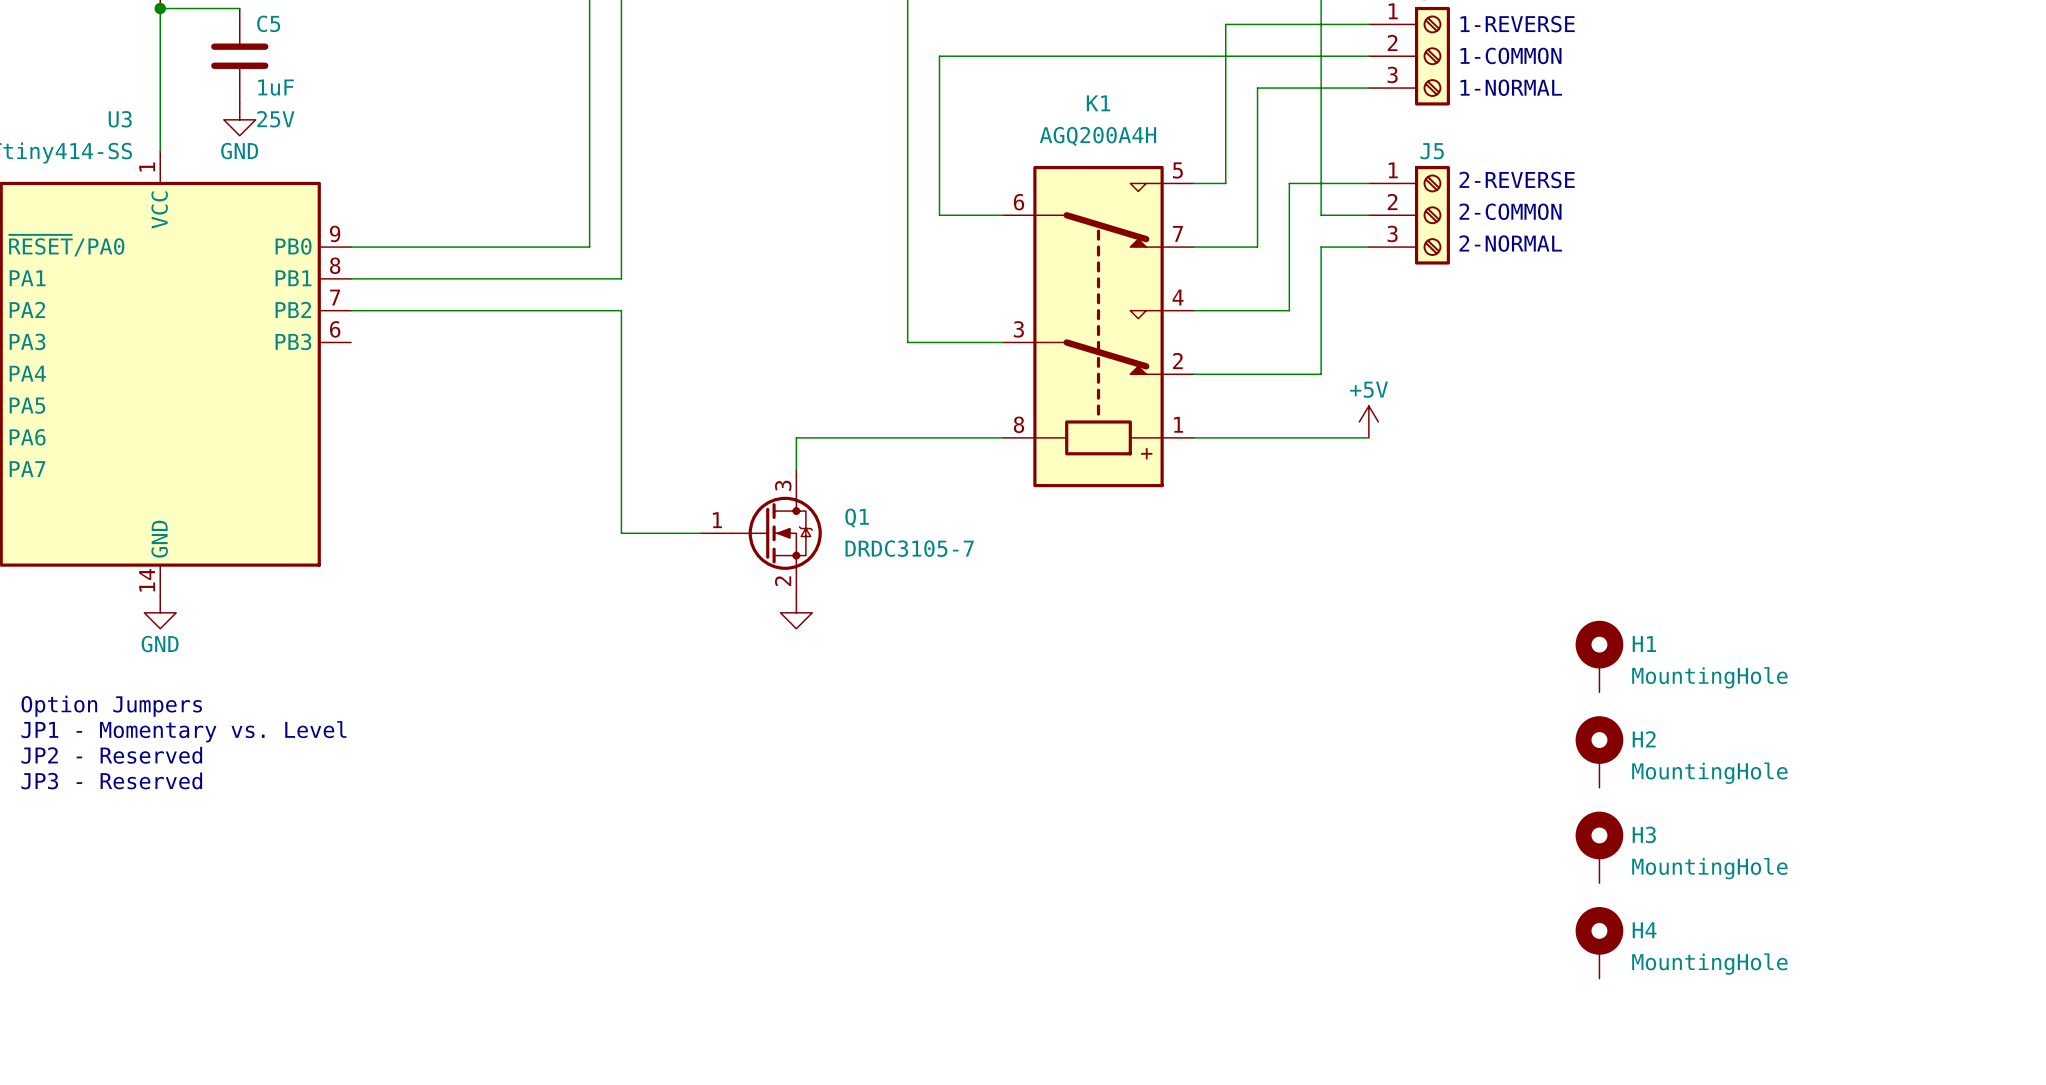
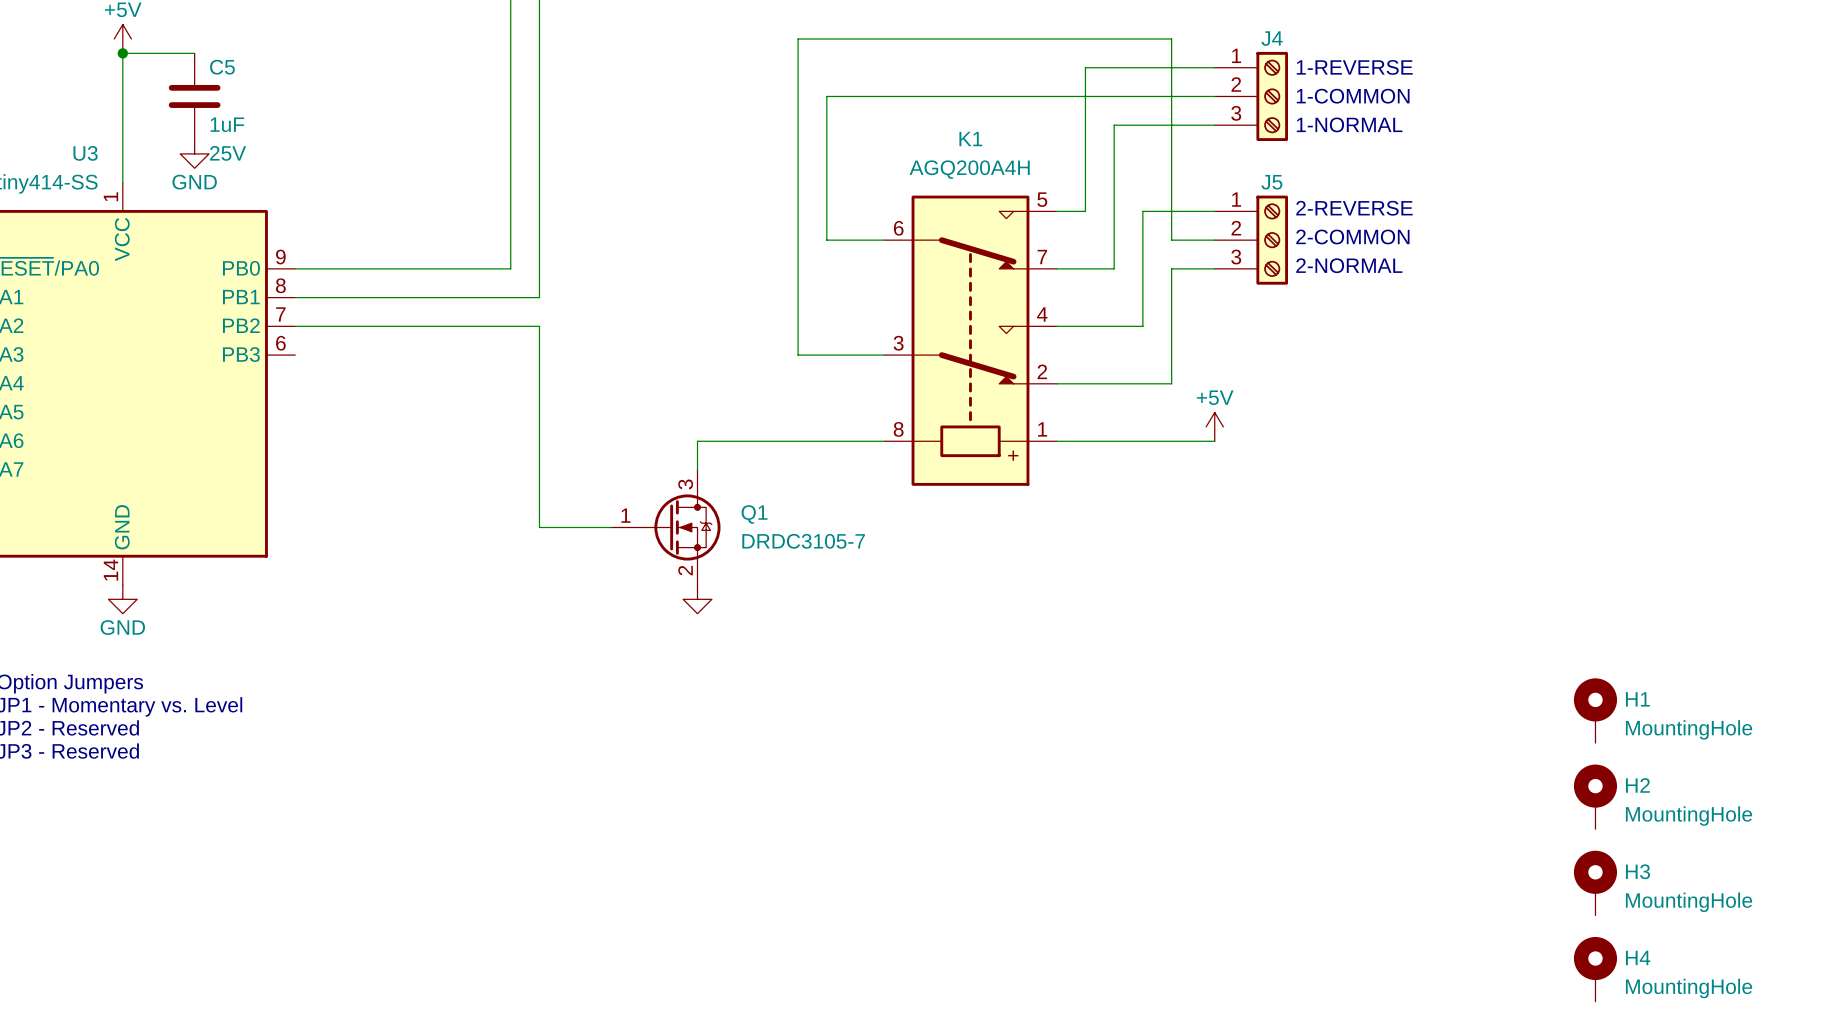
H1 position: (1599, 656) -> (1595, 710)
H2 position: (1599, 751) -> (1595, 796)
H3 position: (1599, 847) -> (1595, 883)
H4 position: (1599, 942) -> (1595, 969)

